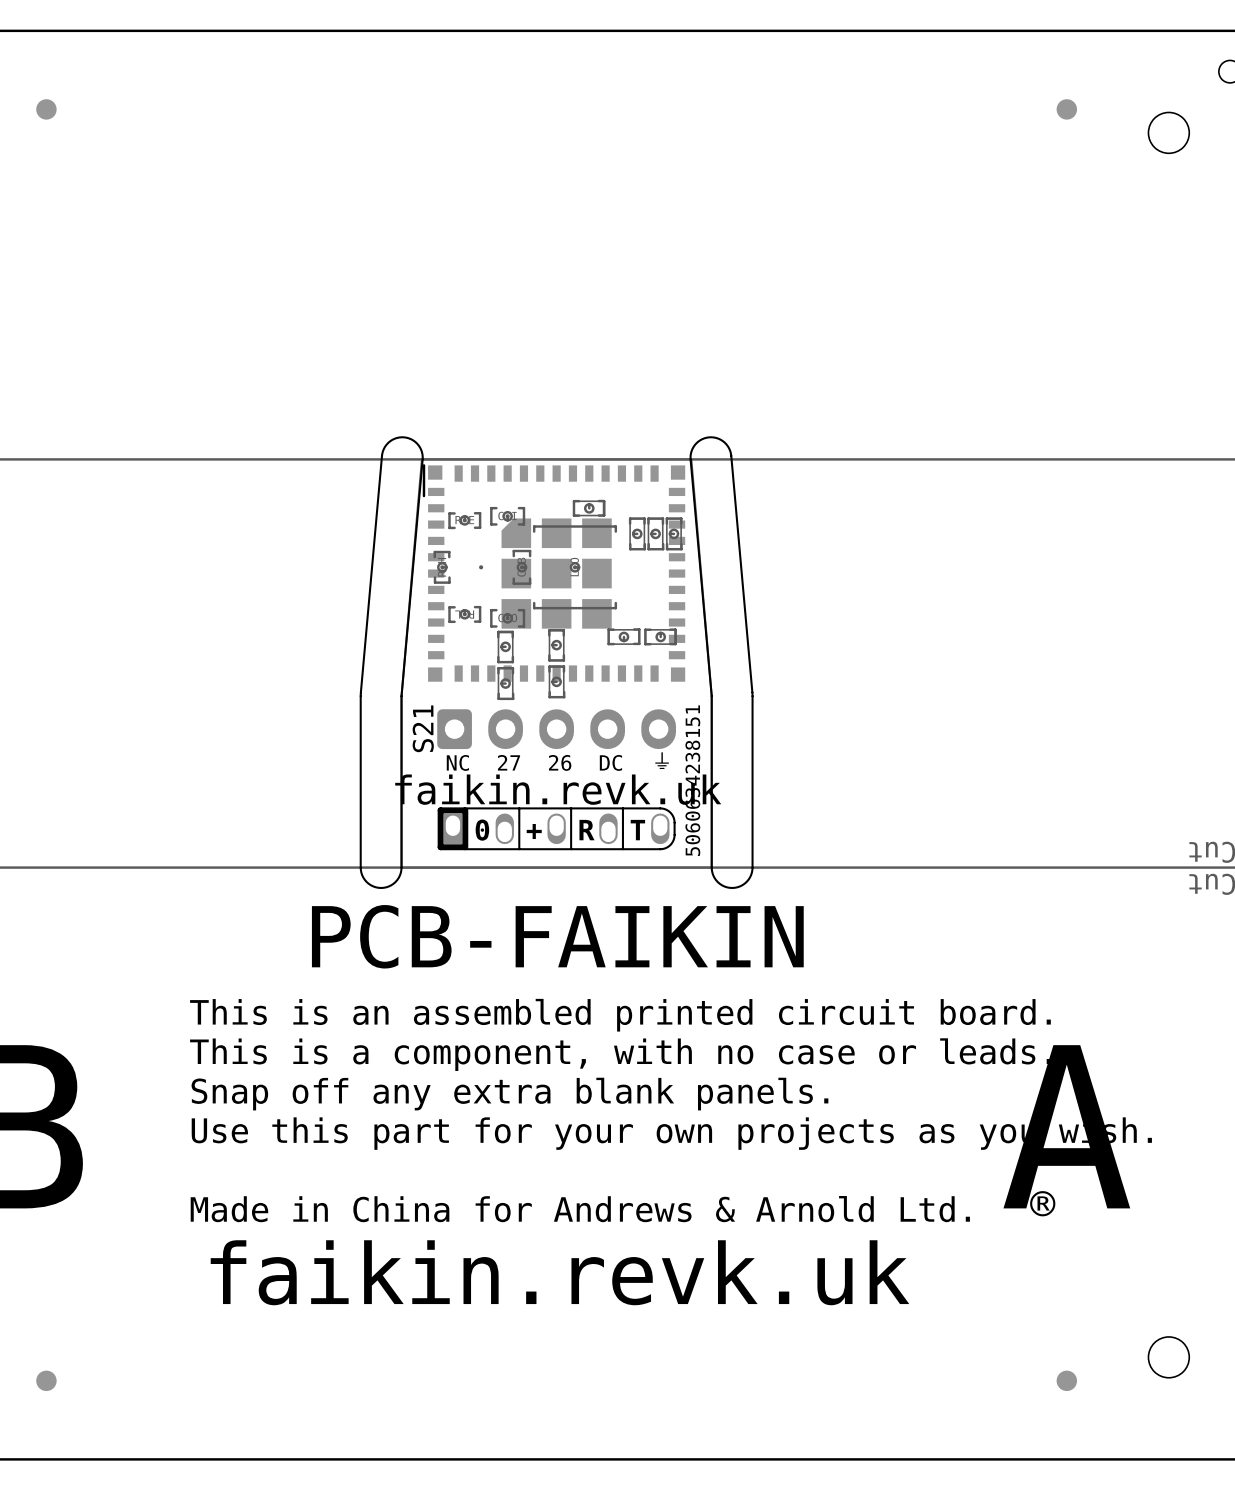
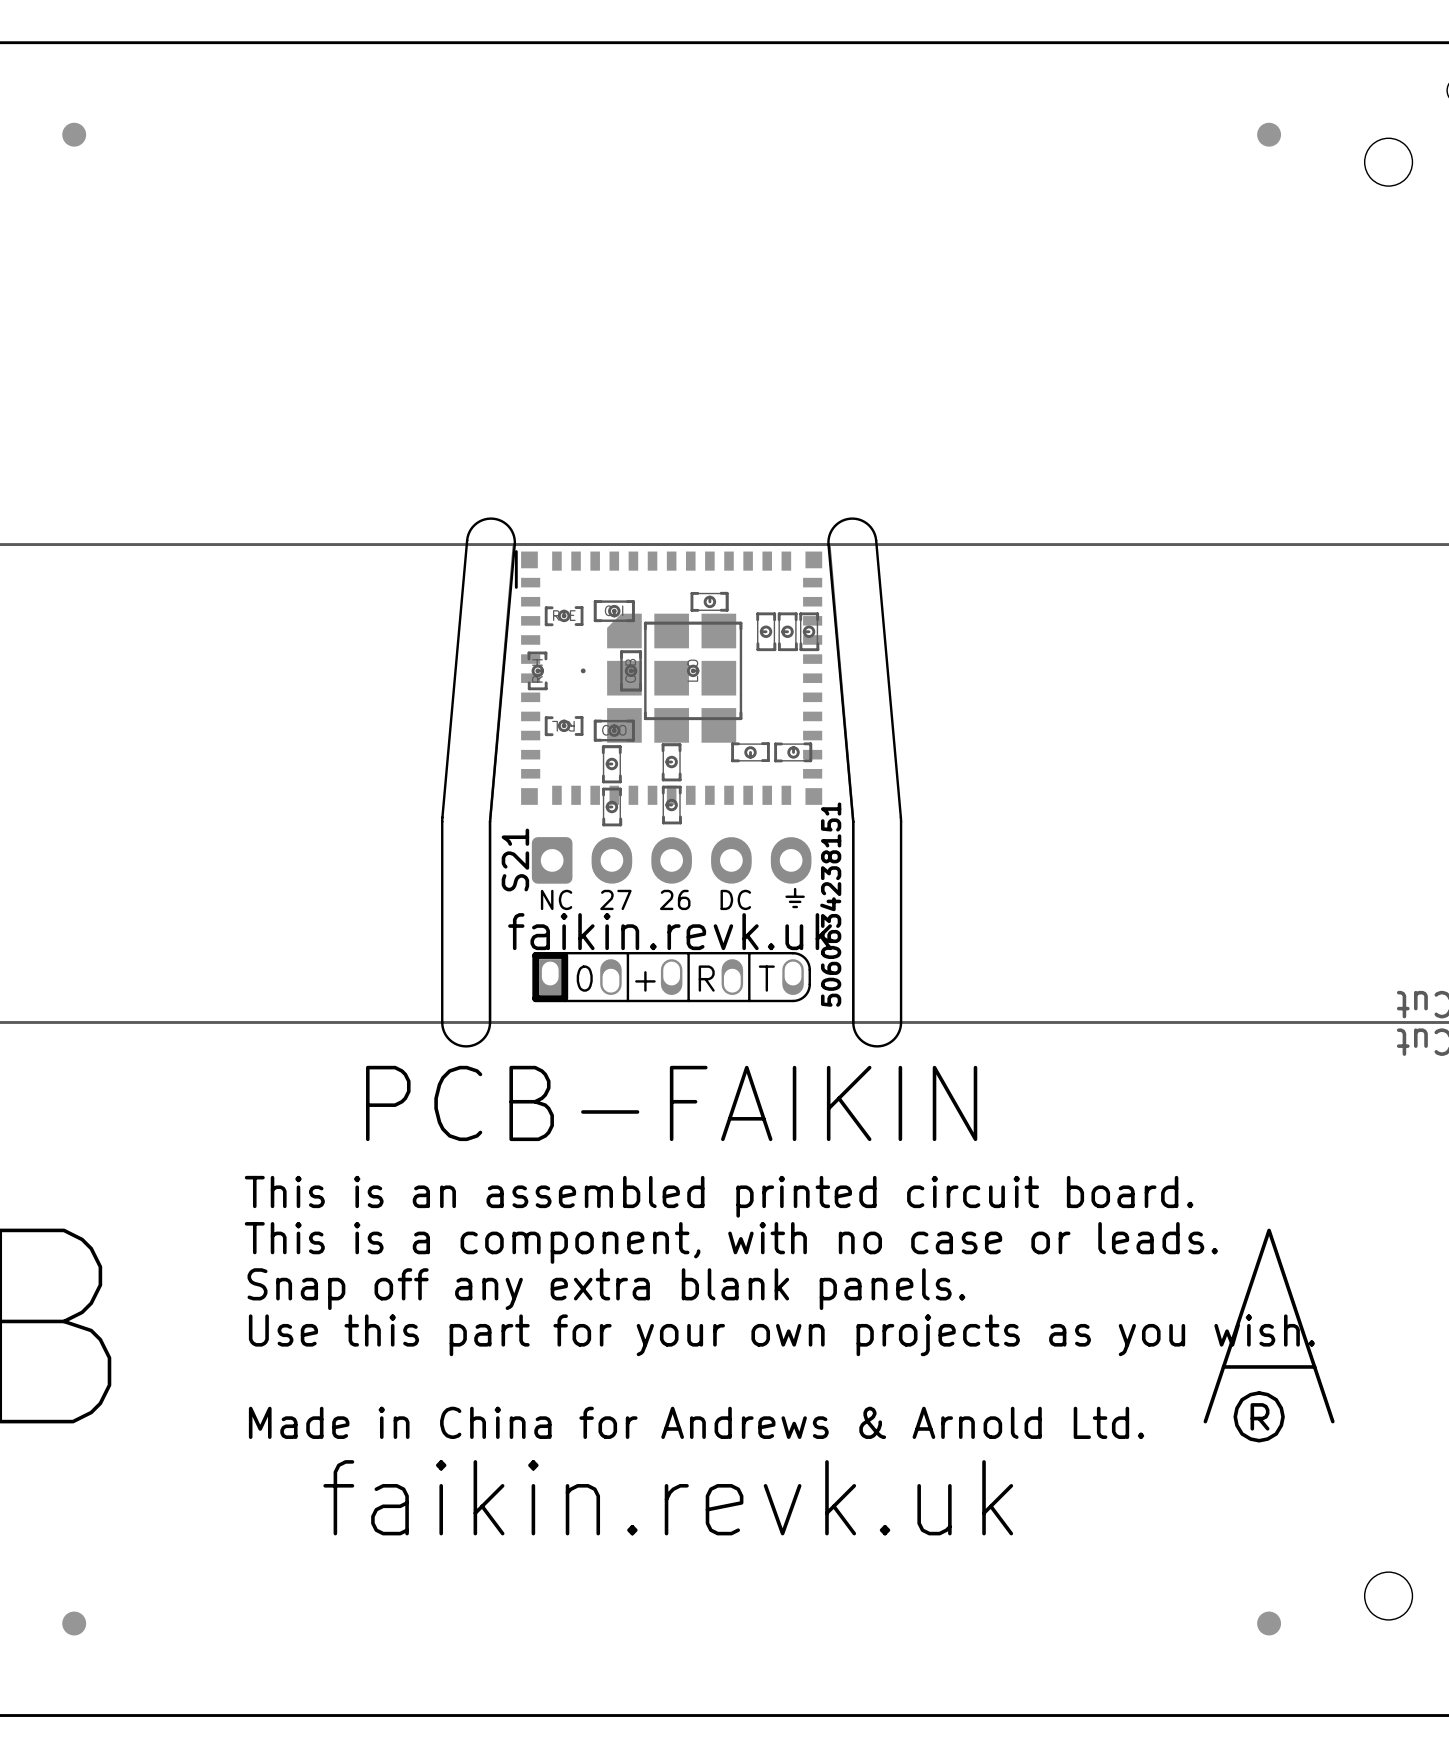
drawing shape: [490, 506, 526, 526] -> [593, 600, 635, 623]
drawing shape: [532, 525, 618, 610] -> [643, 621, 743, 721]
drawing shape: [512, 549, 532, 585] -> [620, 650, 643, 692]
drawing shape: [490, 608, 526, 628] -> [593, 719, 635, 742]

